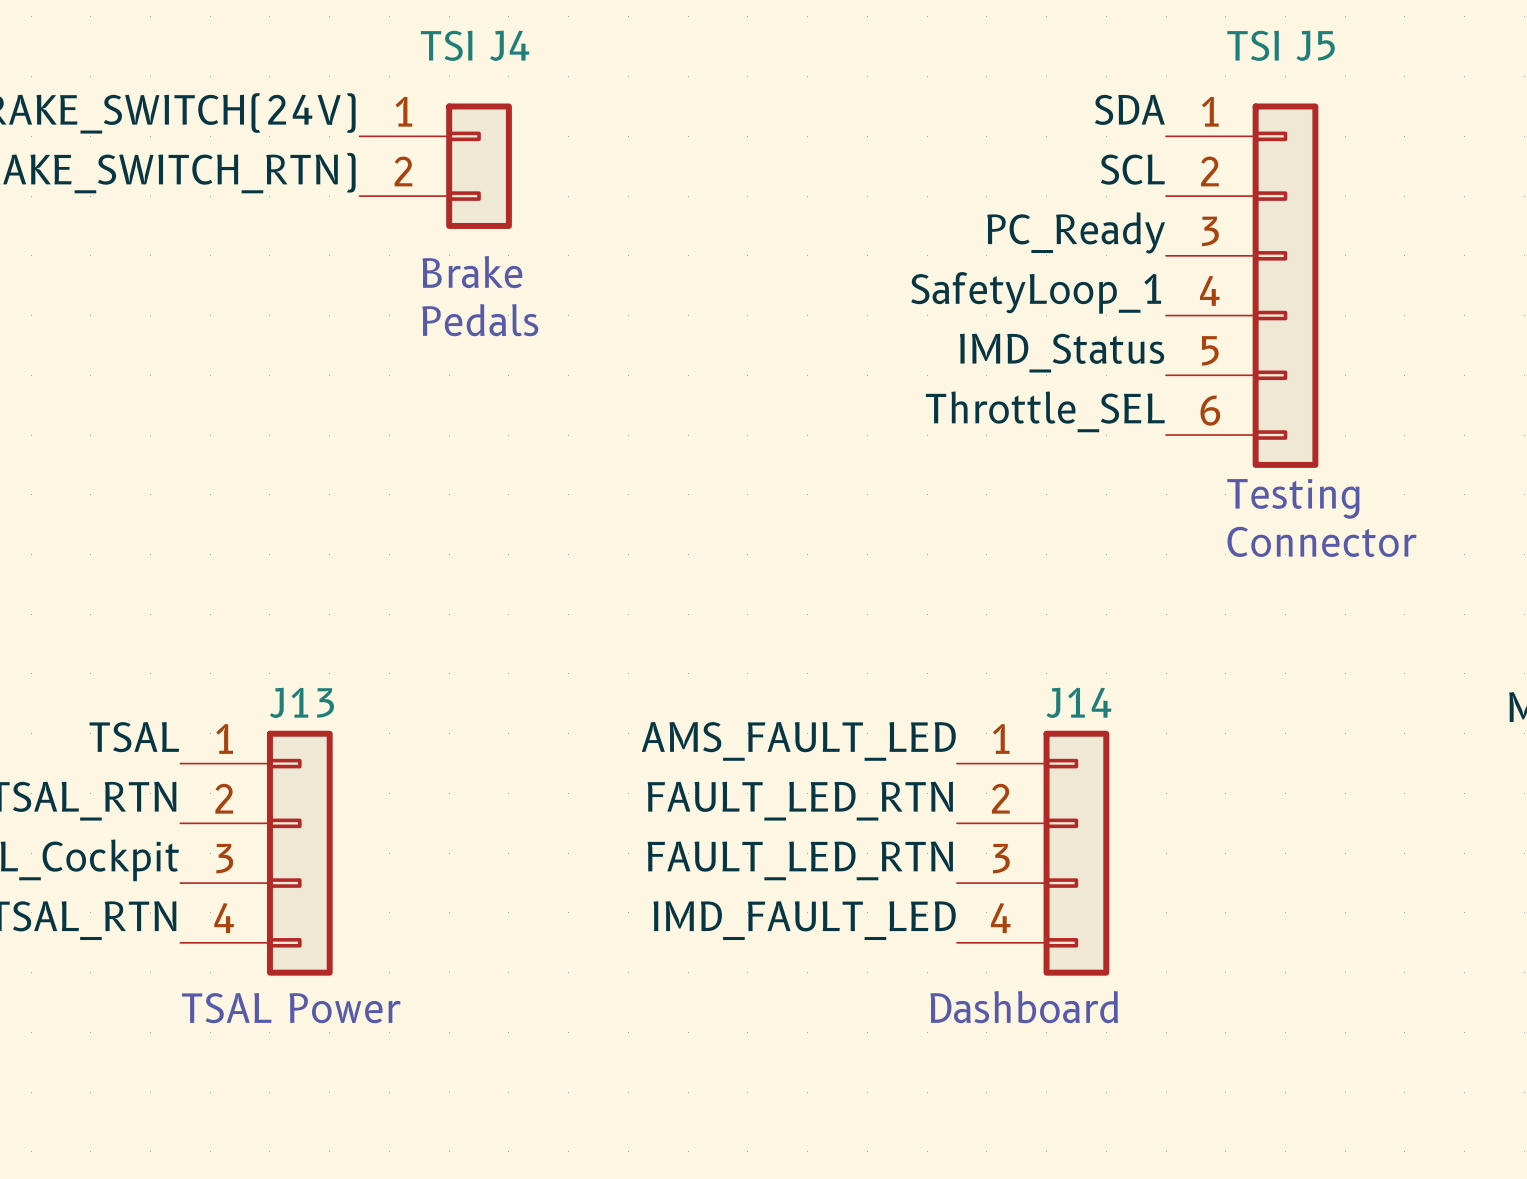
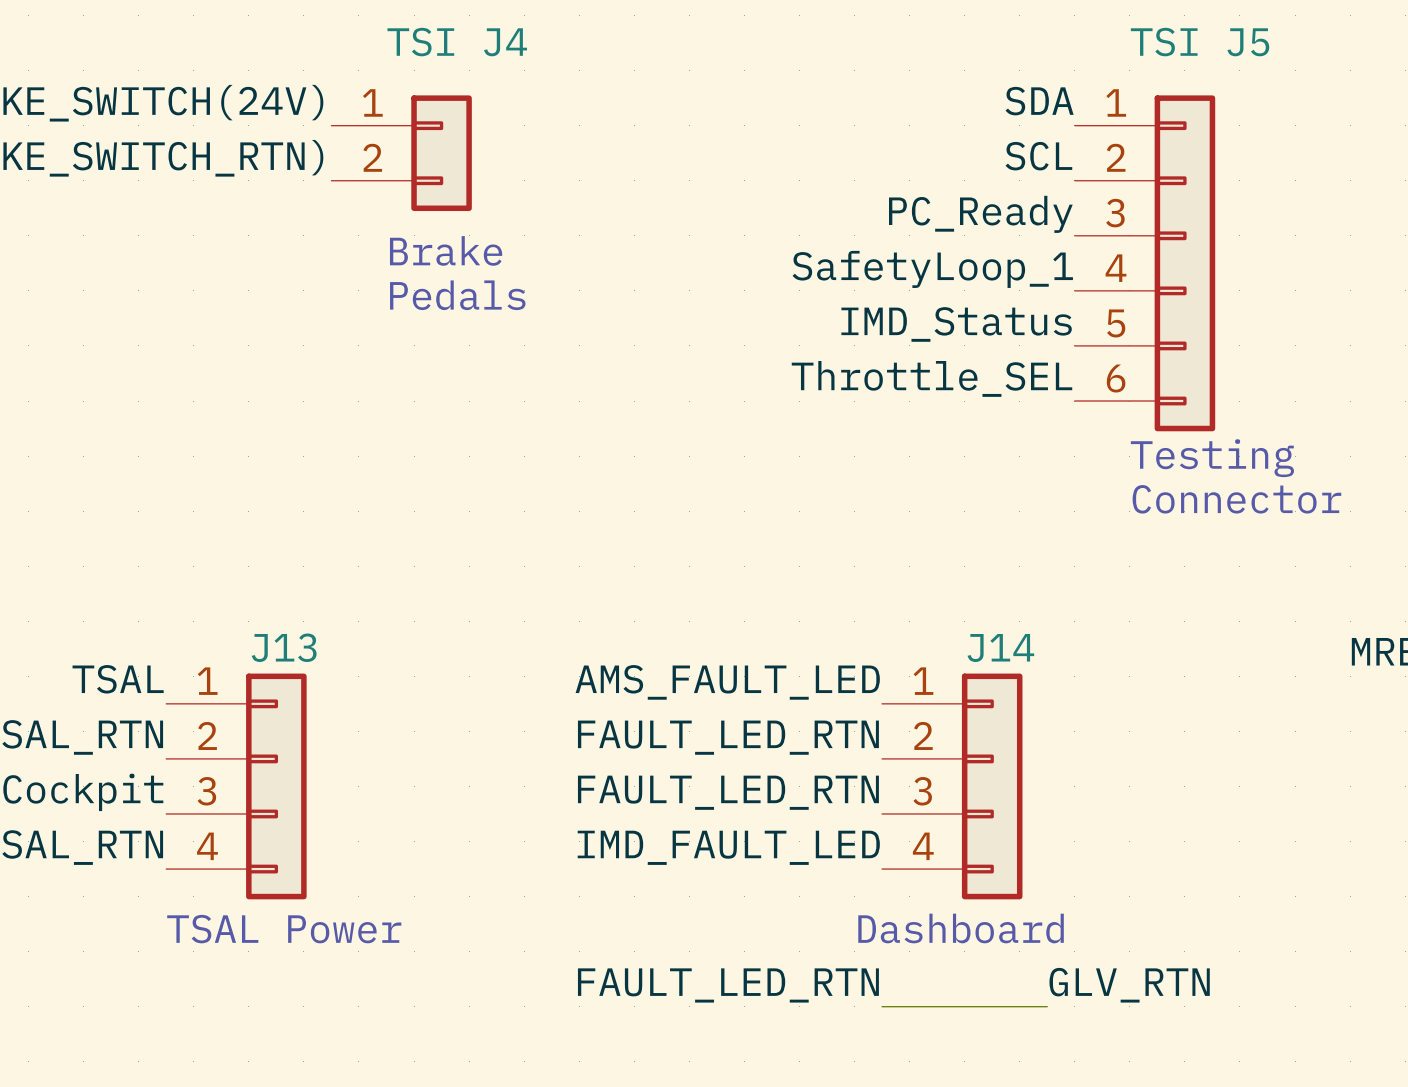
label: none -> FAULT_LED_RTN (728, 985)
label: none -> GLV_RTN (1129, 985)
wire: none -> (882, 1006) (1047, 1006)

